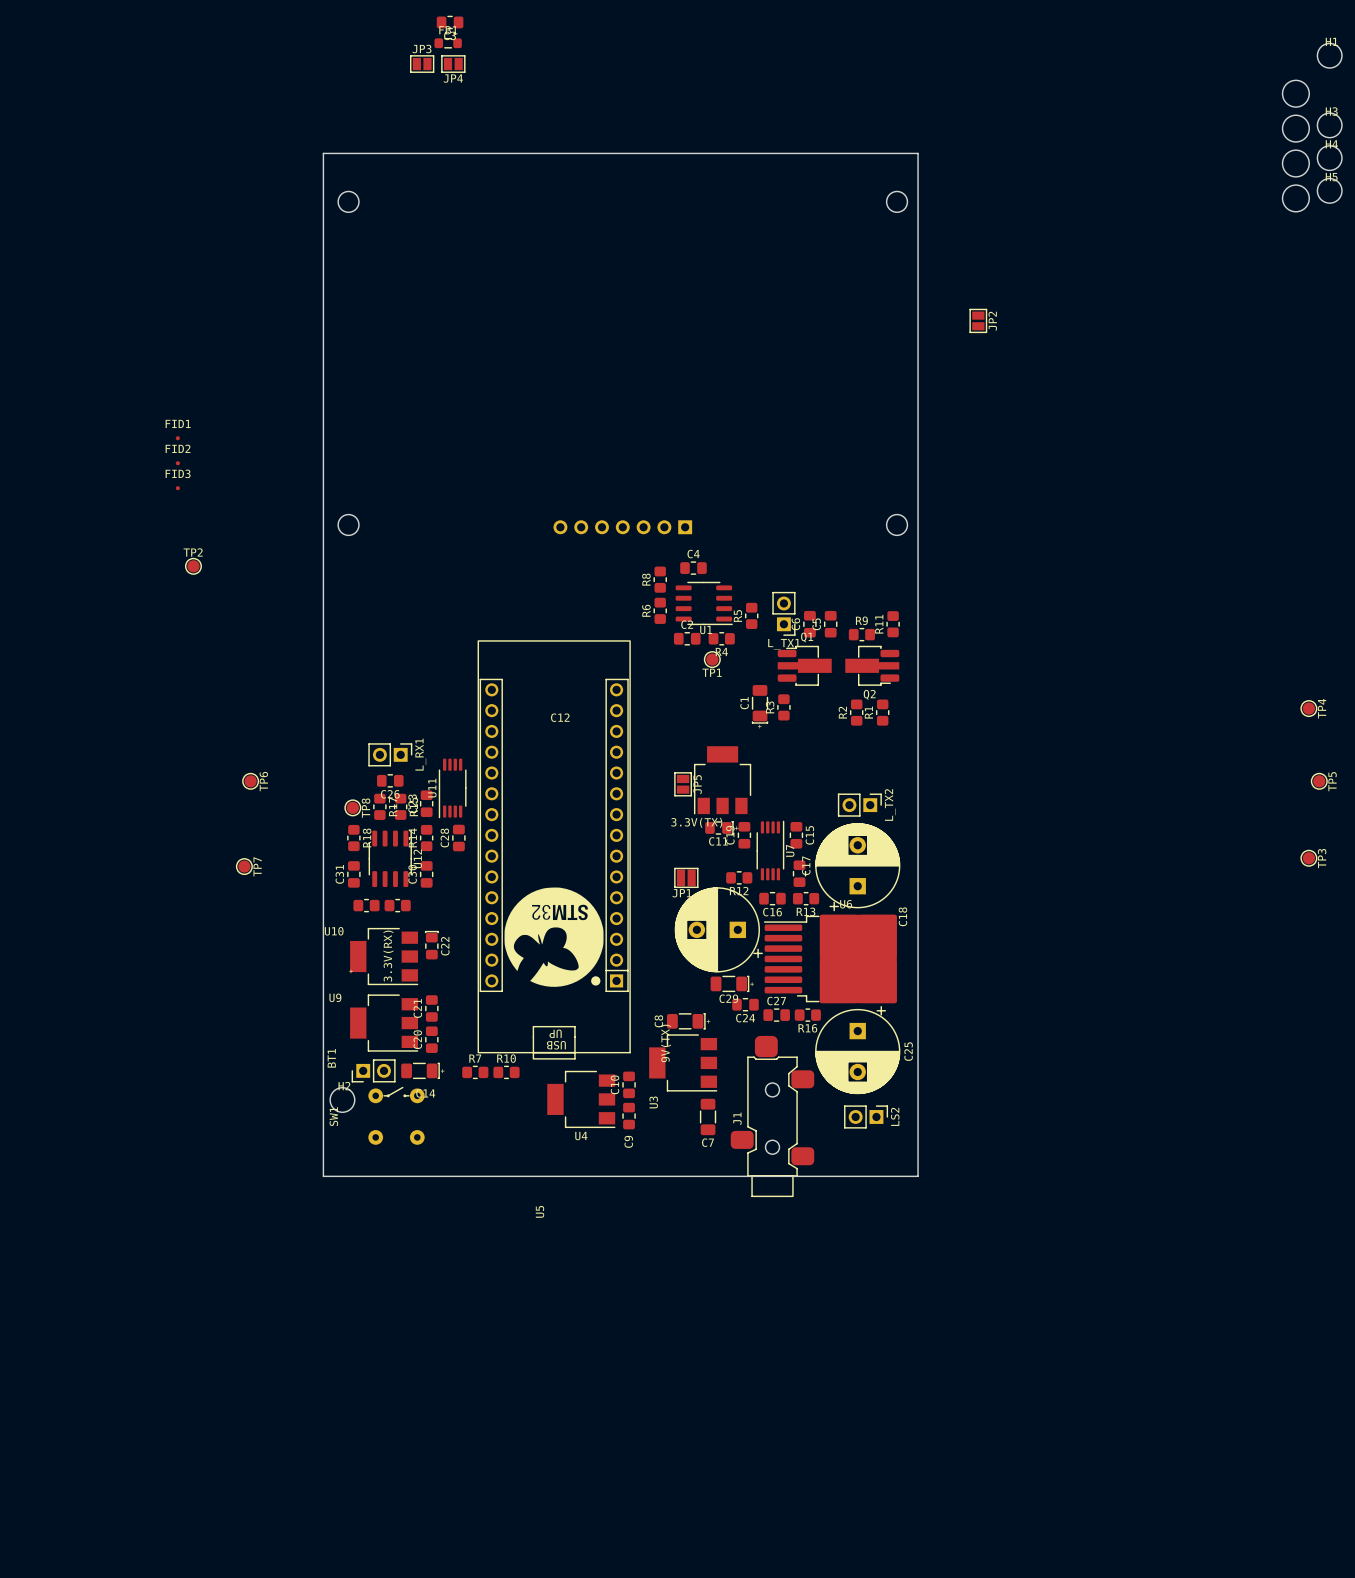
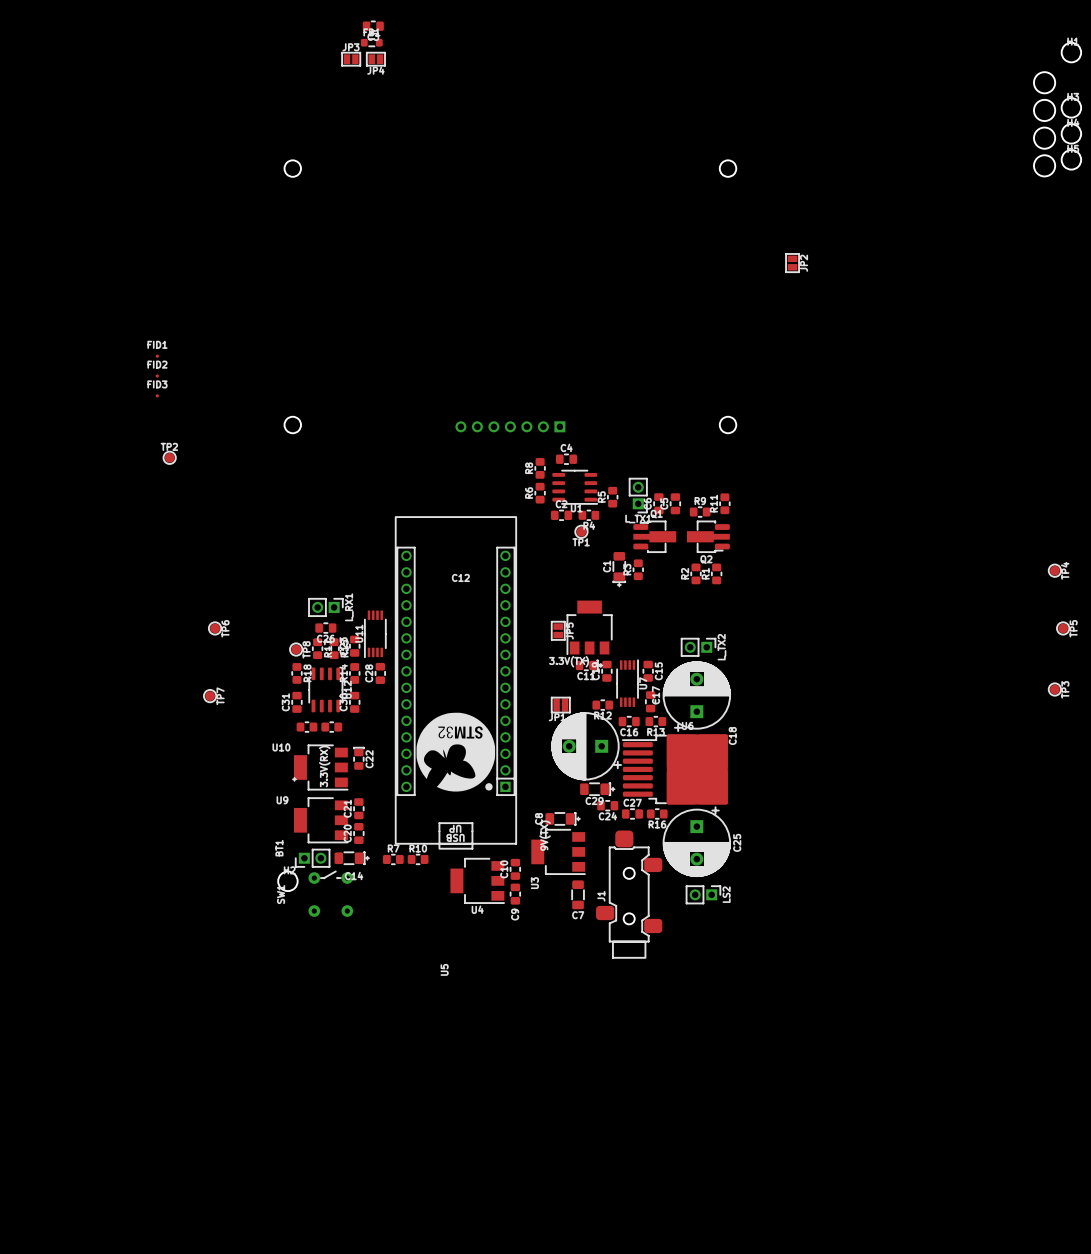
board edge: (323, 153) (918, 153) (918, 1176) (323, 1176) (323, 153) -> none

